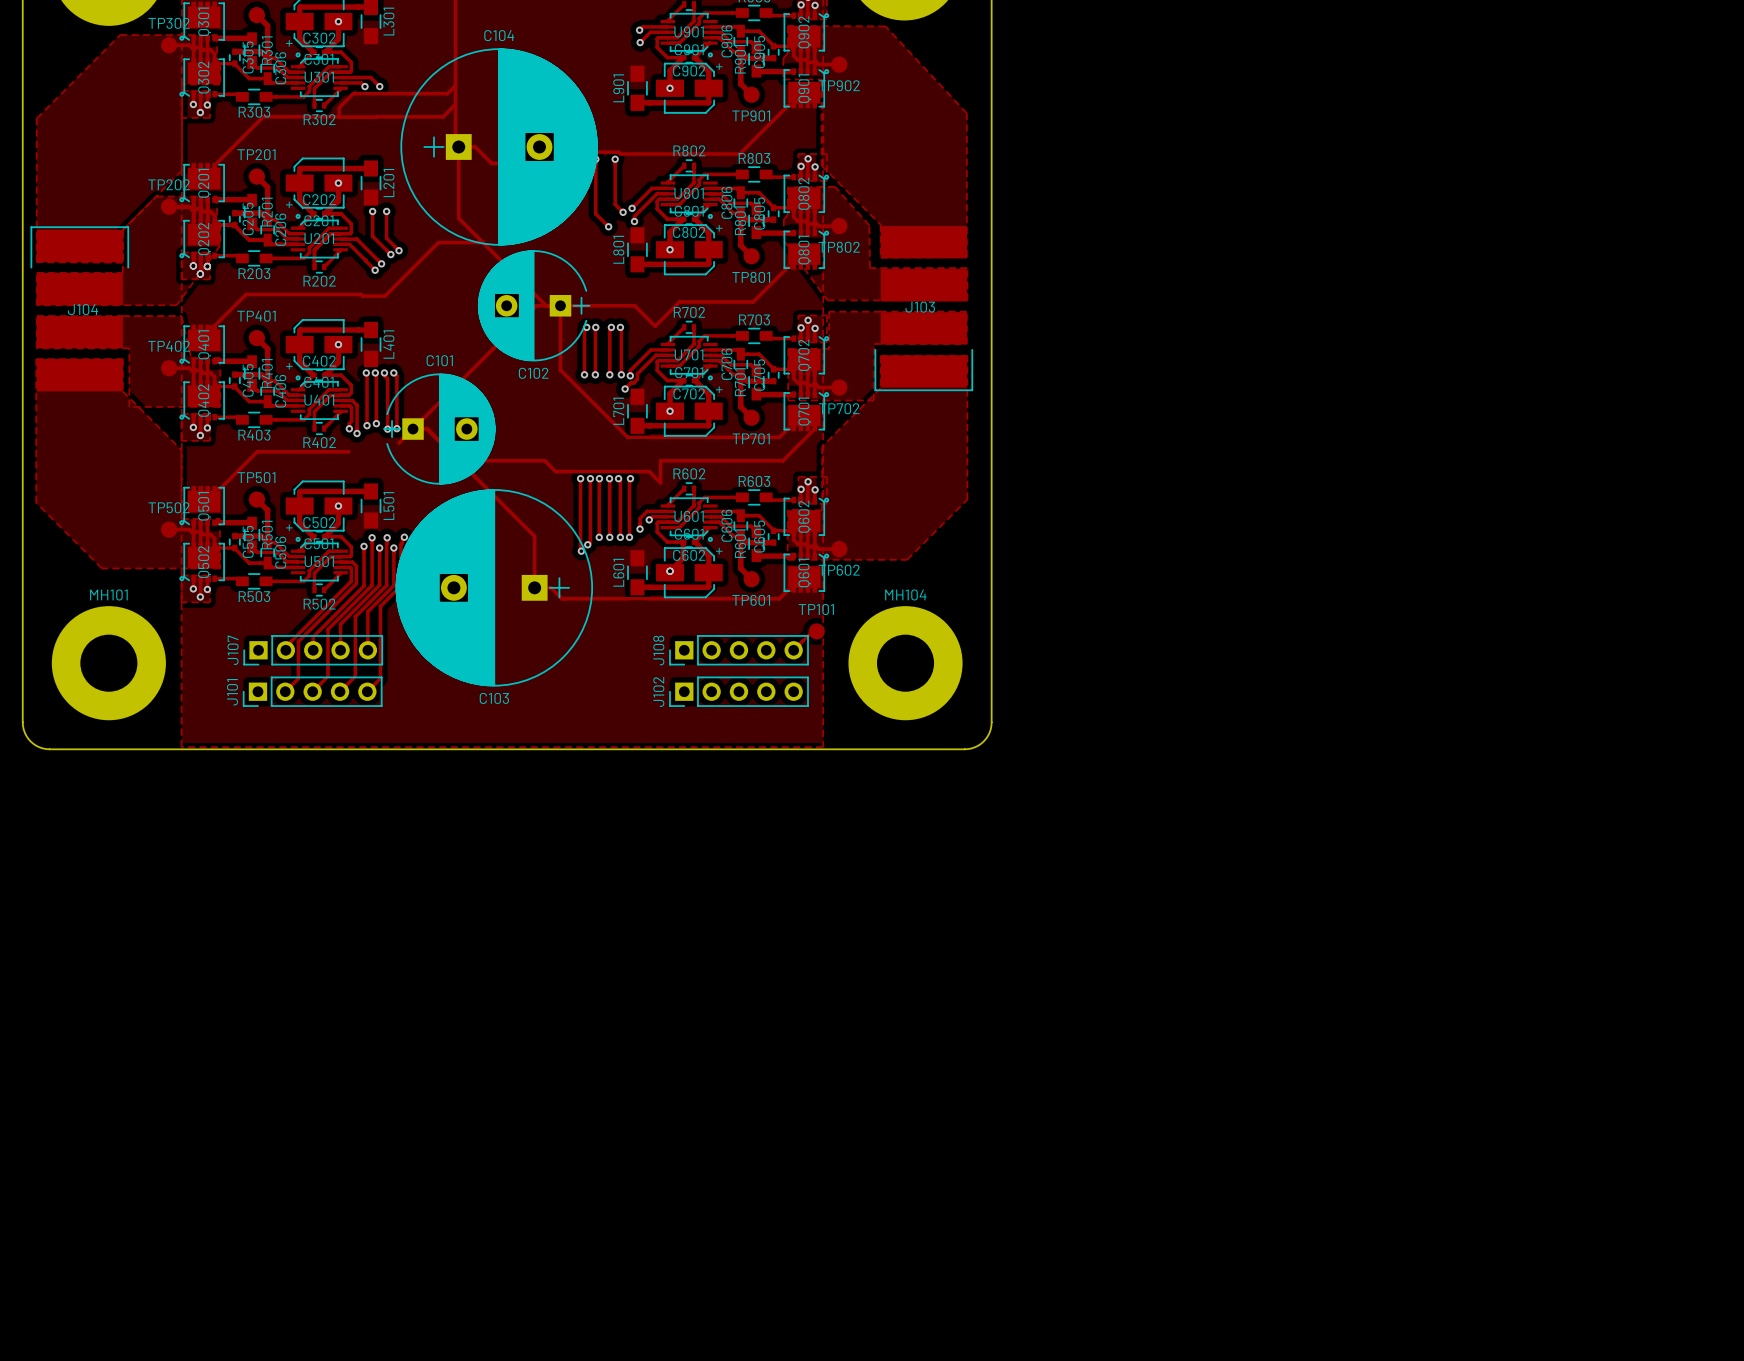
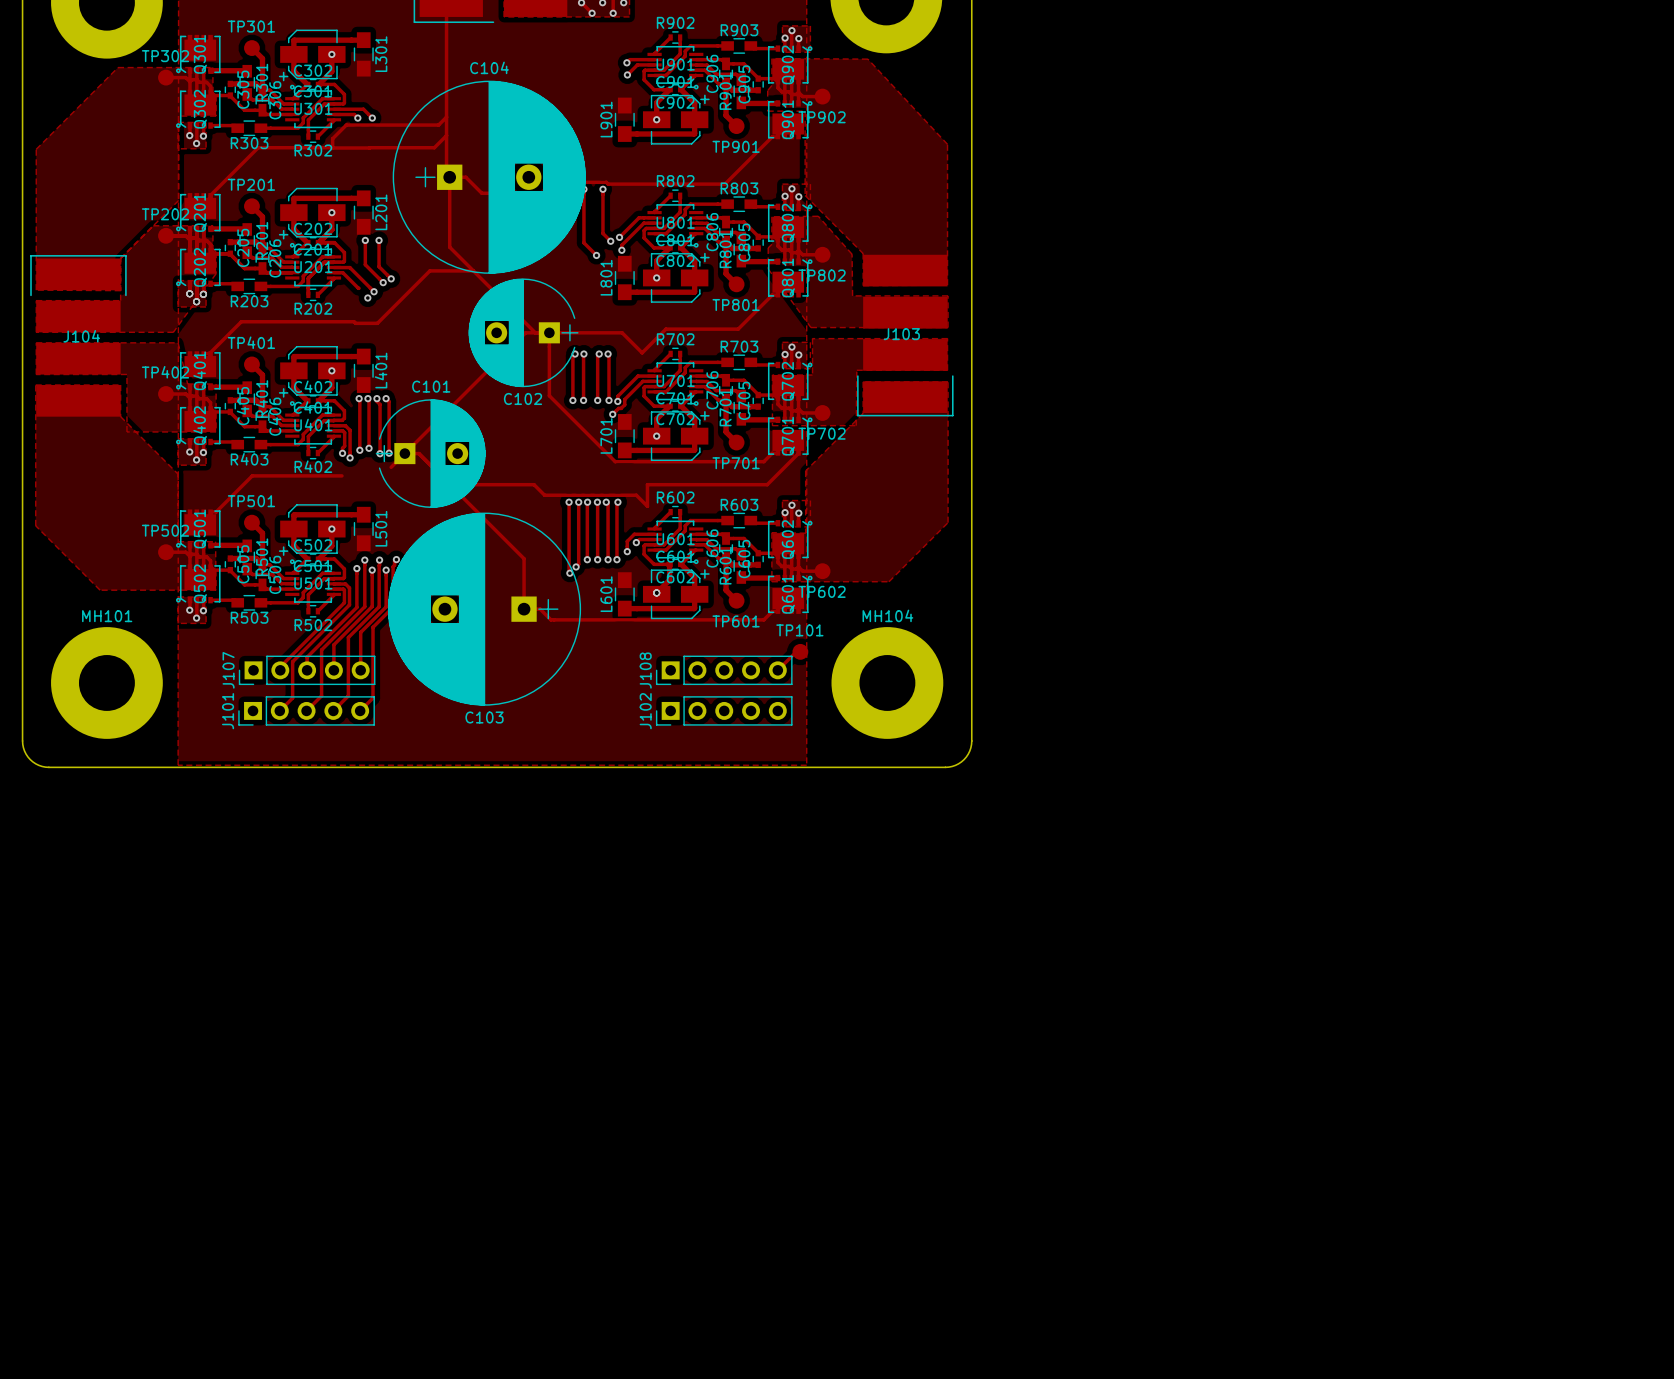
track: (365, 260) (375, 270) -> none

